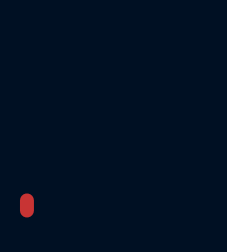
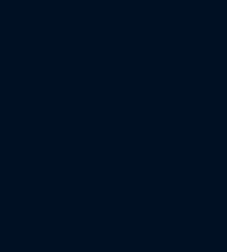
track: (26, 200) (26, 210) -> none

